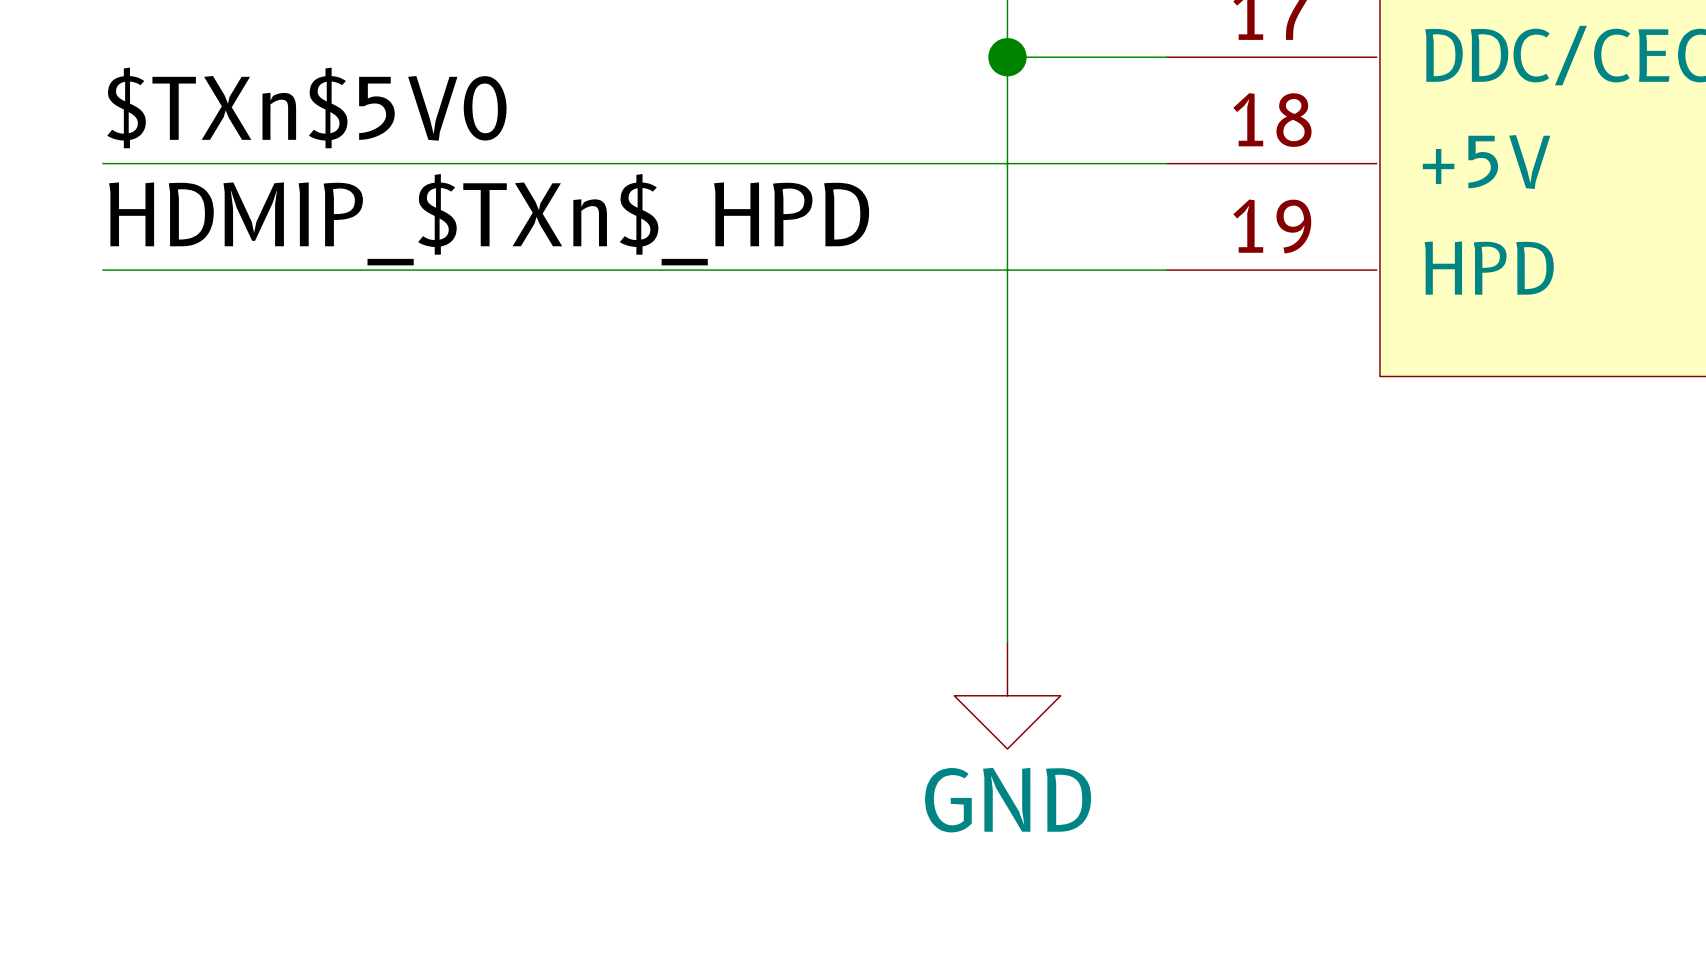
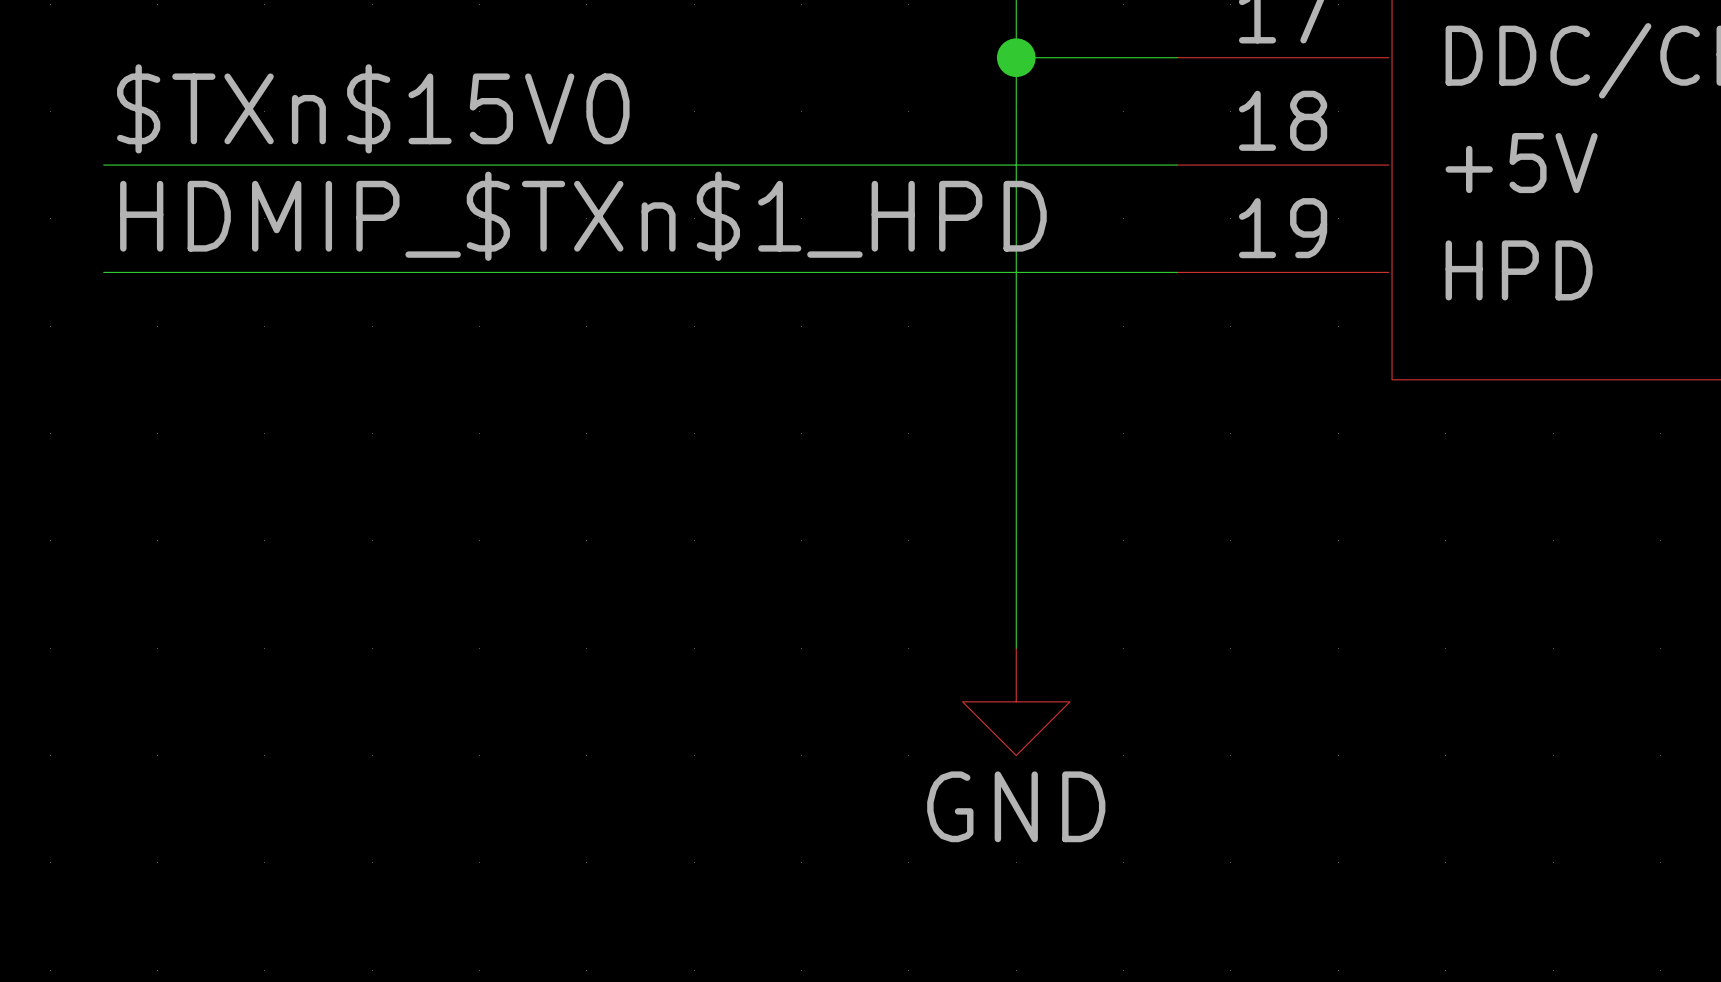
label: $TXn$5V0 (306, 107) -> $TXn$15V0 (373, 108)
label: HDMIP_$TXn$_HPD (489, 219) -> HDMIP_$TXn$1_HPD (583, 216)

